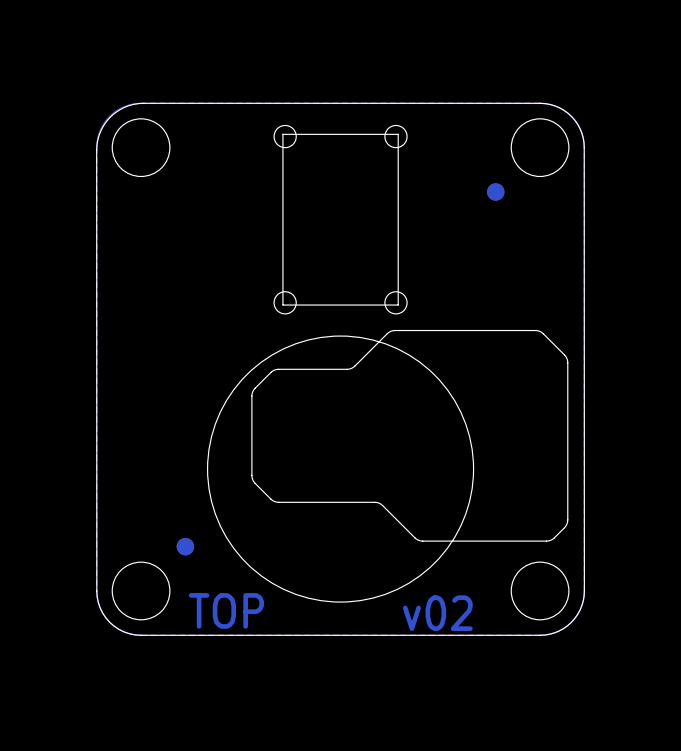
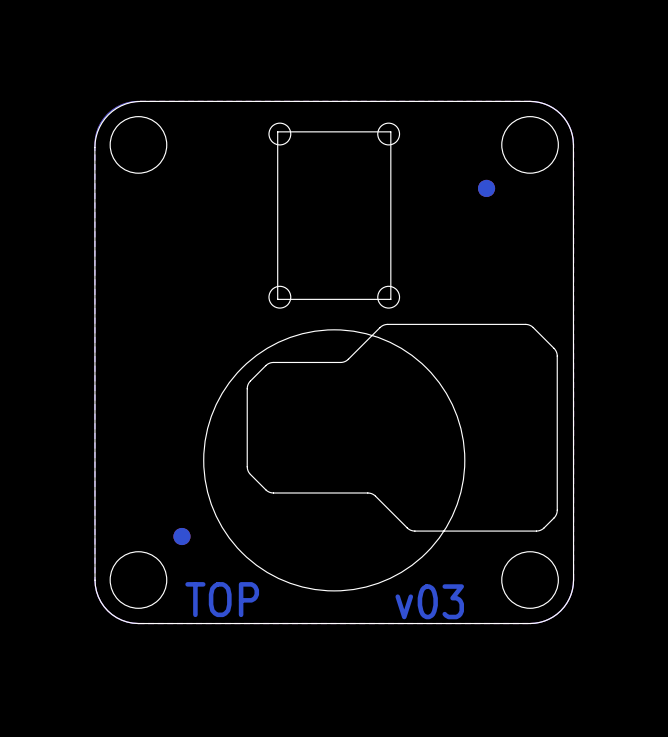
text: v02 (437, 613) -> v03 (429, 601)

